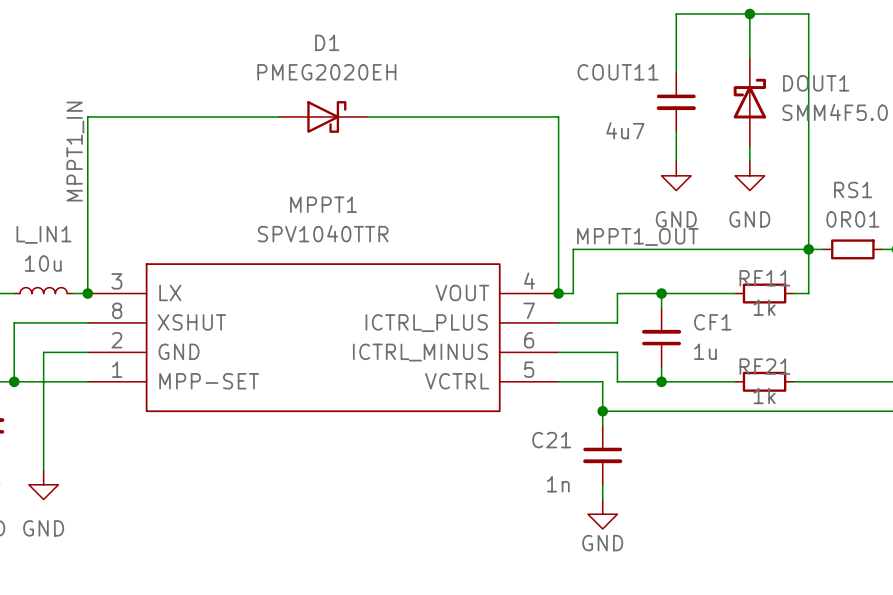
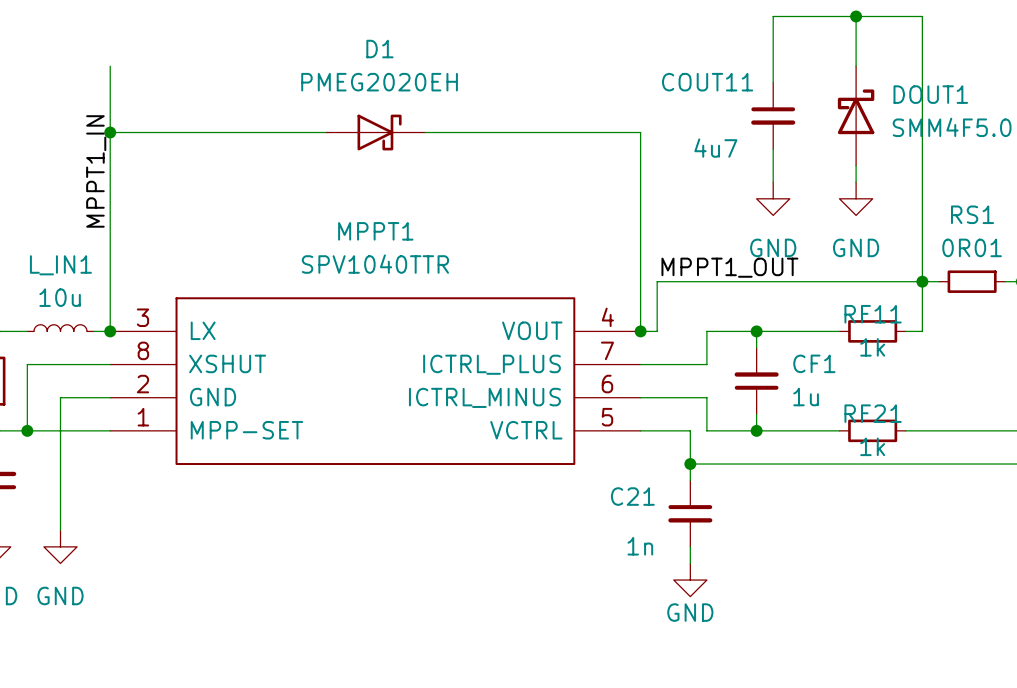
wire: none -> (110, 66) (110, 132)
junction: none -> (110, 132)

